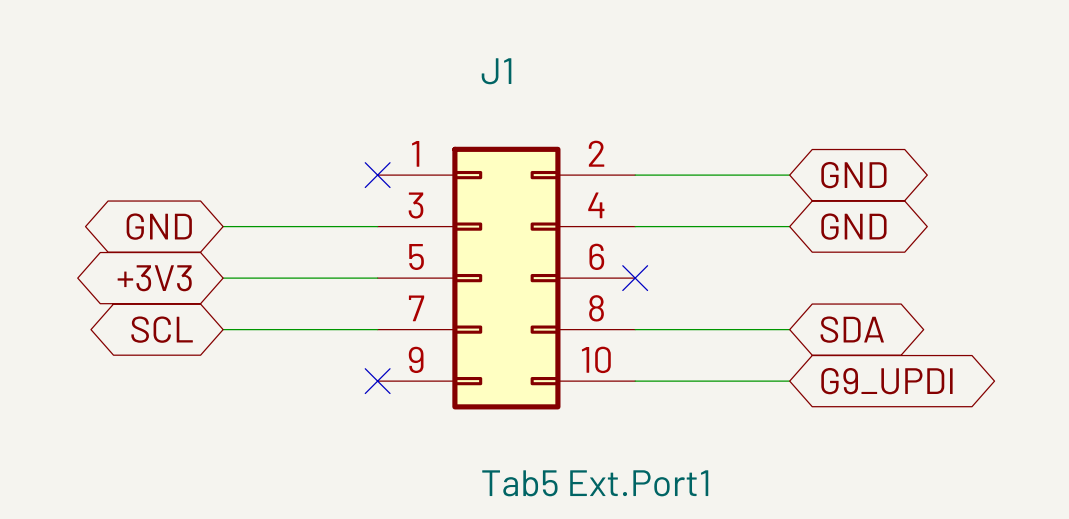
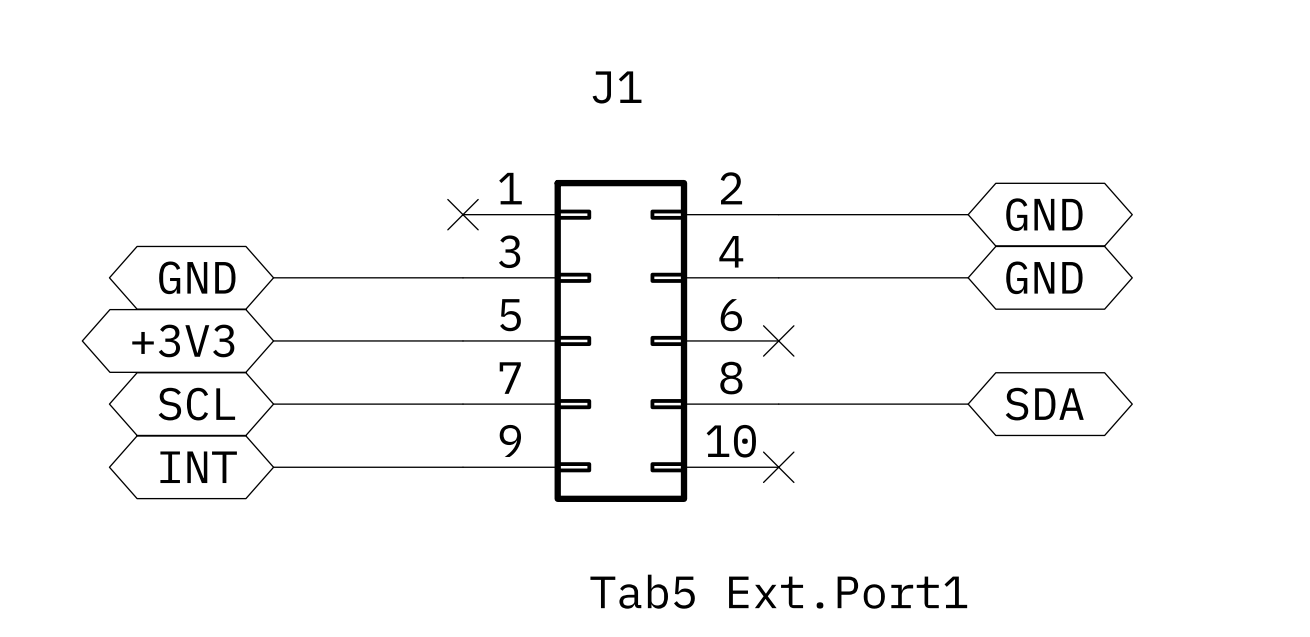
global label: none -> INT (198, 467)
no-connect mark: (377, 381) -> none
wire: (635, 381) (789, 381) -> (273, 467) (462, 467)
no-connect mark: none -> (778, 467)
global label: G9_UPDI (886, 381) -> none

